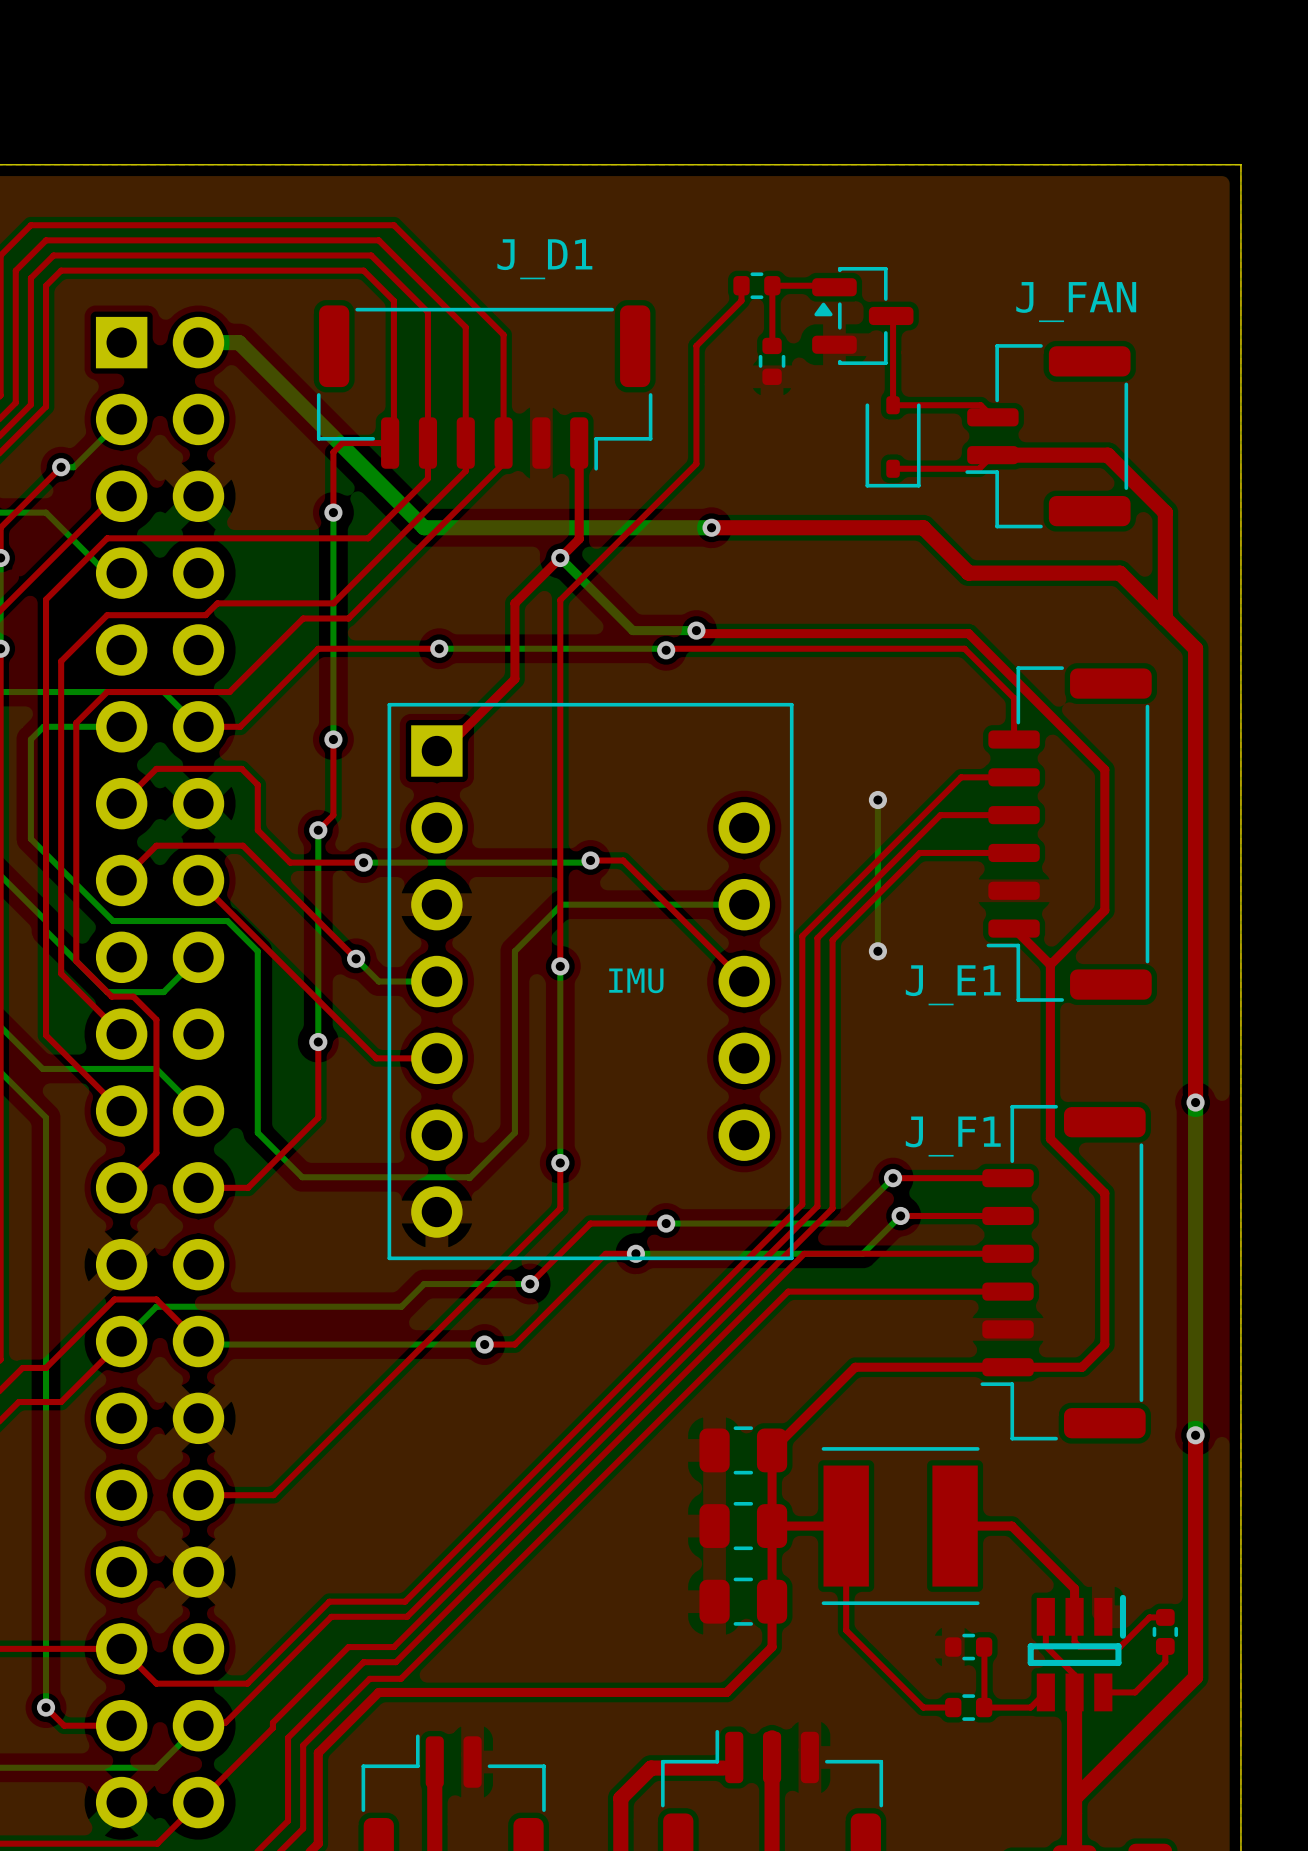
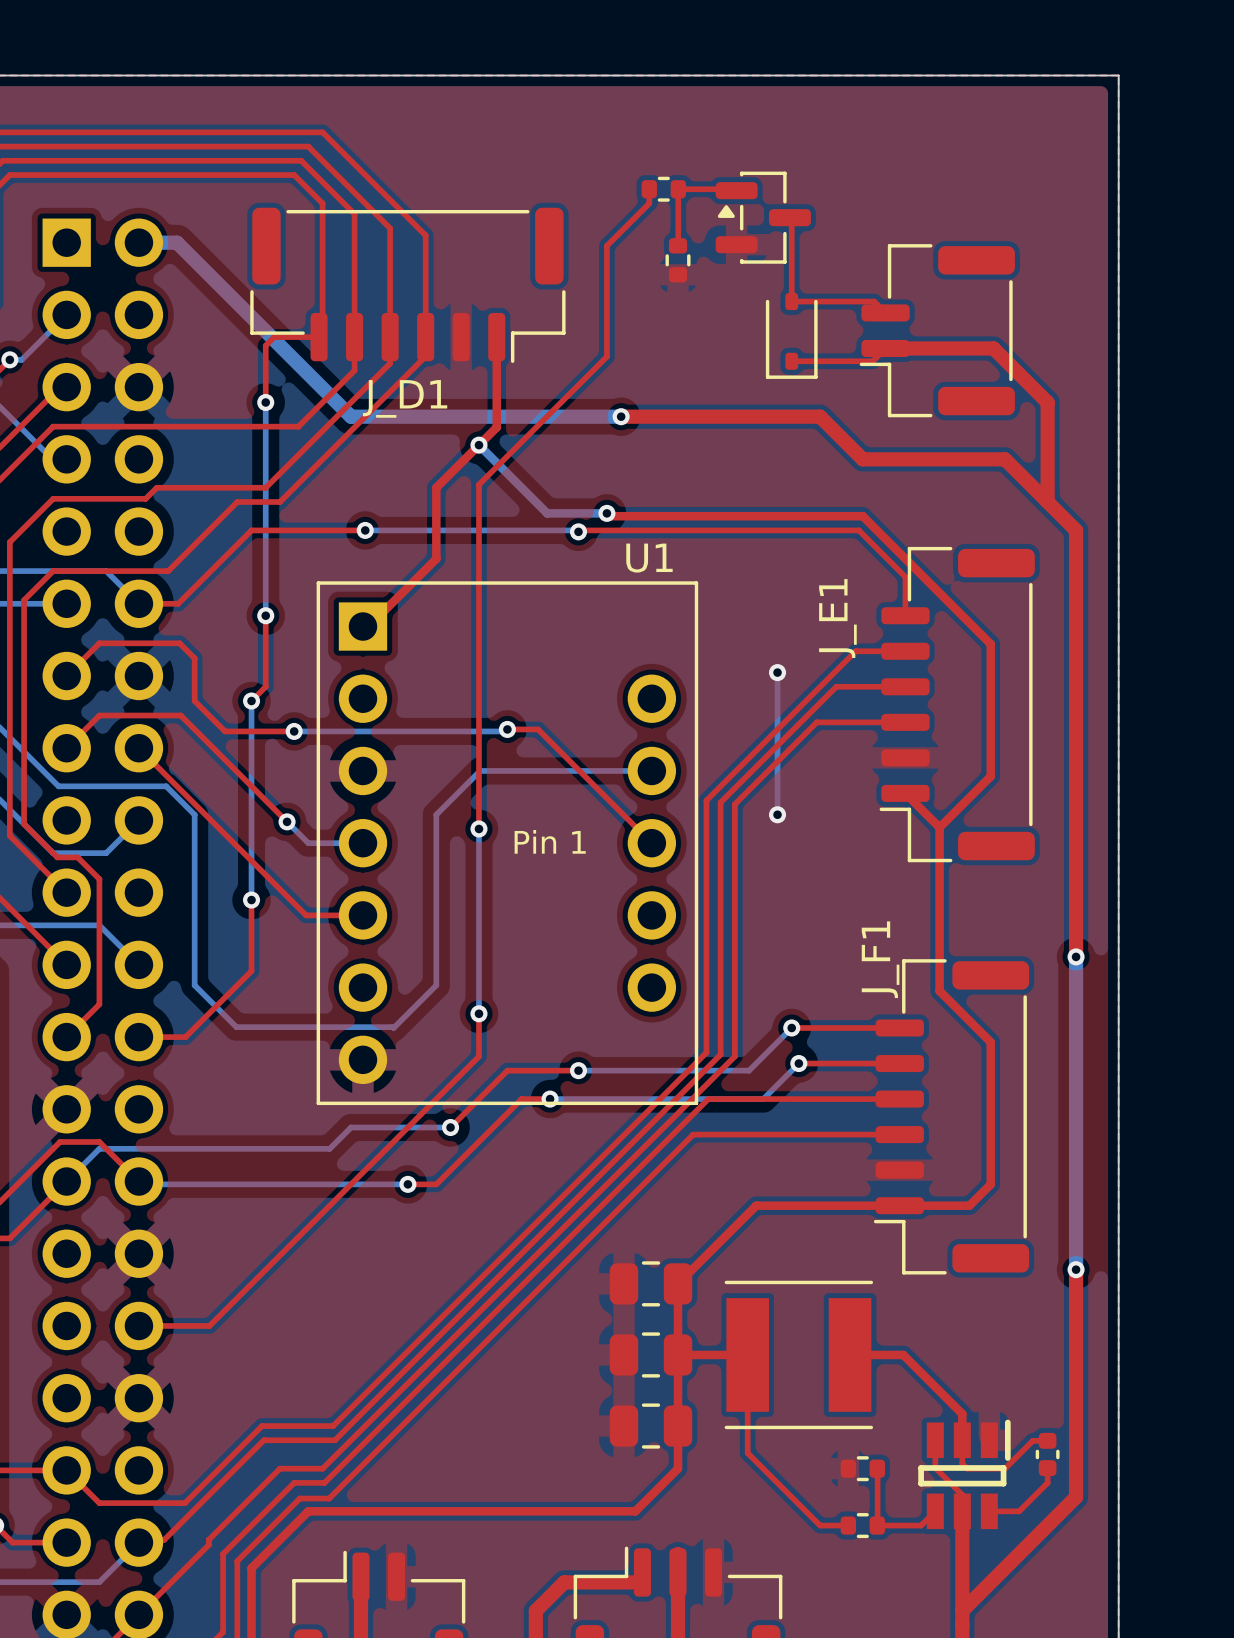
J_D1 name position: J_D1 (544, 259) -> J_D1 (405, 398)
text: J_FAN (1076, 302) -> none
U1 name: none -> U1 (649, 558)
U1 text: IMU (636, 980) -> Pin 1 (550, 841)
J_E1 name rotation: 0° (953, 985) -> 90° counterclockwise (837, 618)
J_E1 name position: J_E1 (953, 985) -> J_E1 (837, 618)
J_F1 name rotation: 0° (953, 1136) -> 90° counterclockwise (880, 959)

